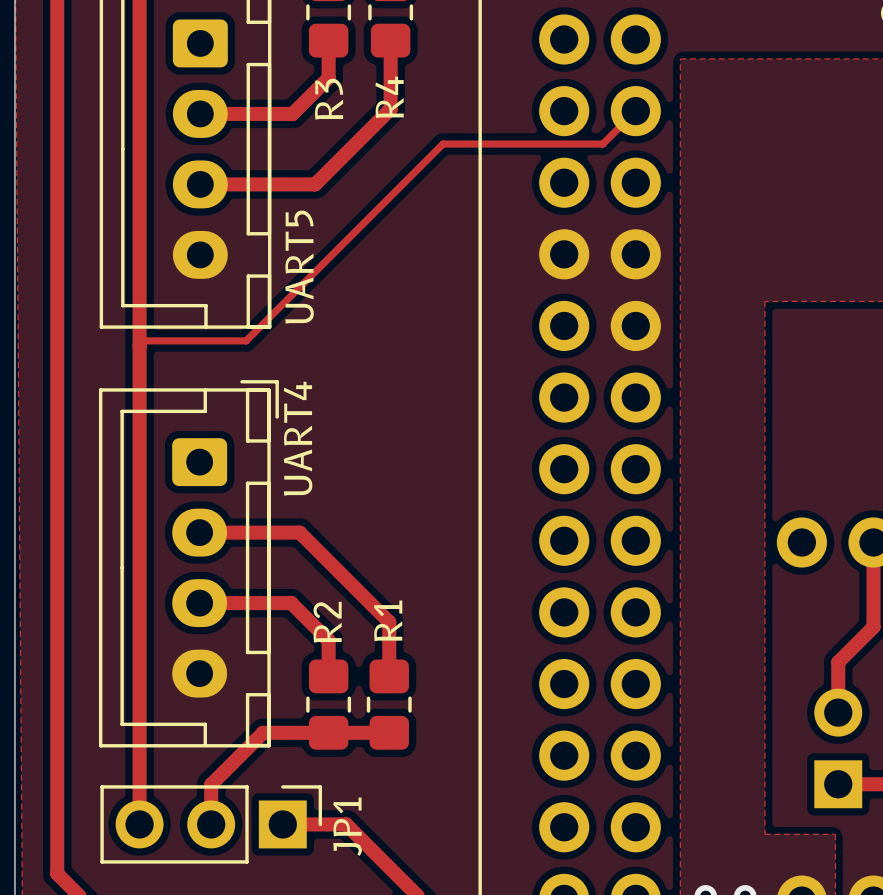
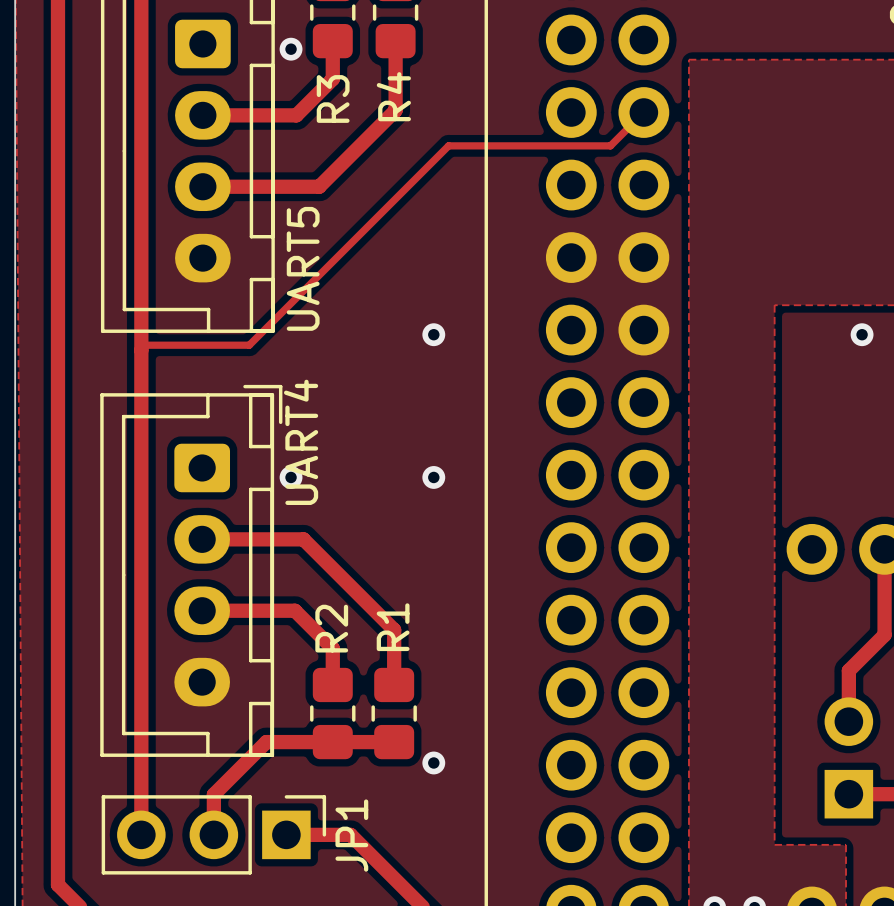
via: none -> (291, 49)
via: none -> (433, 334)
via: none -> (862, 334)
via: none -> (291, 477)
via: none -> (433, 477)
via: none -> (433, 762)

